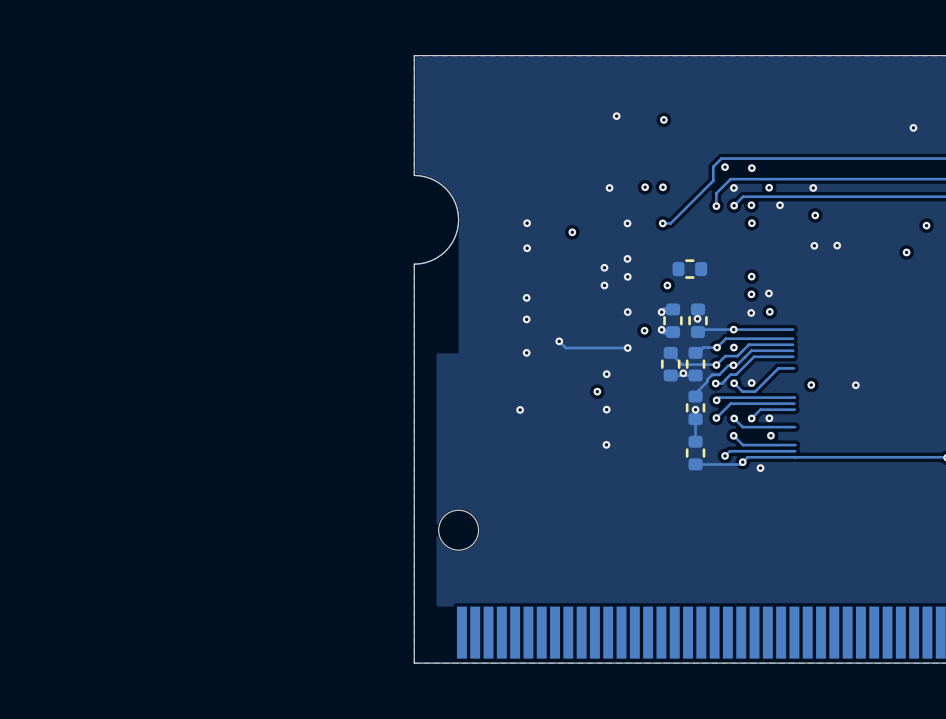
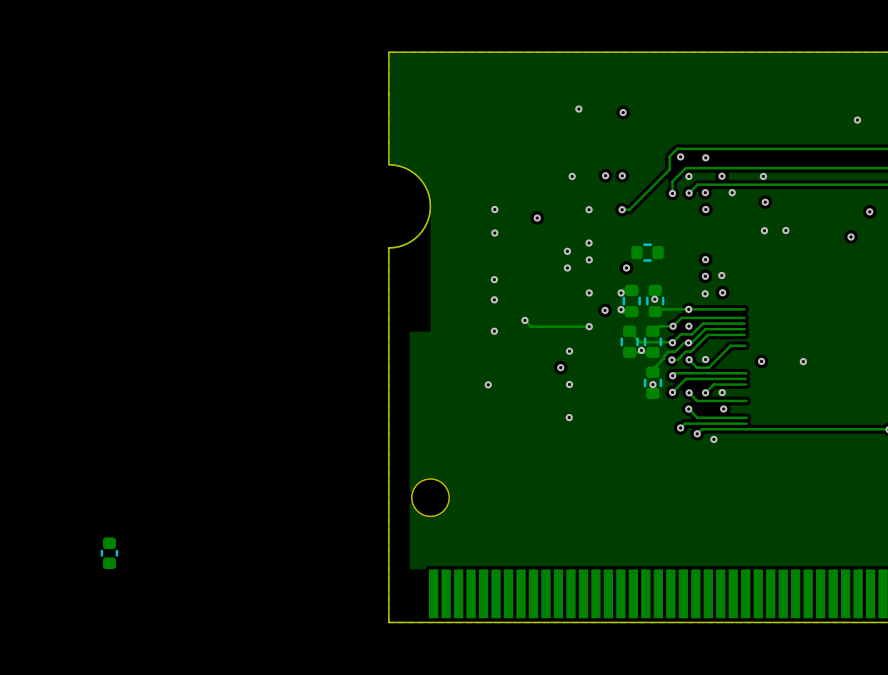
track: (695, 419) (695, 441) -> none
part: (695, 453) -> none
track: (742, 462) (740, 464) (695, 464) -> none
part: none -> (109, 553)

